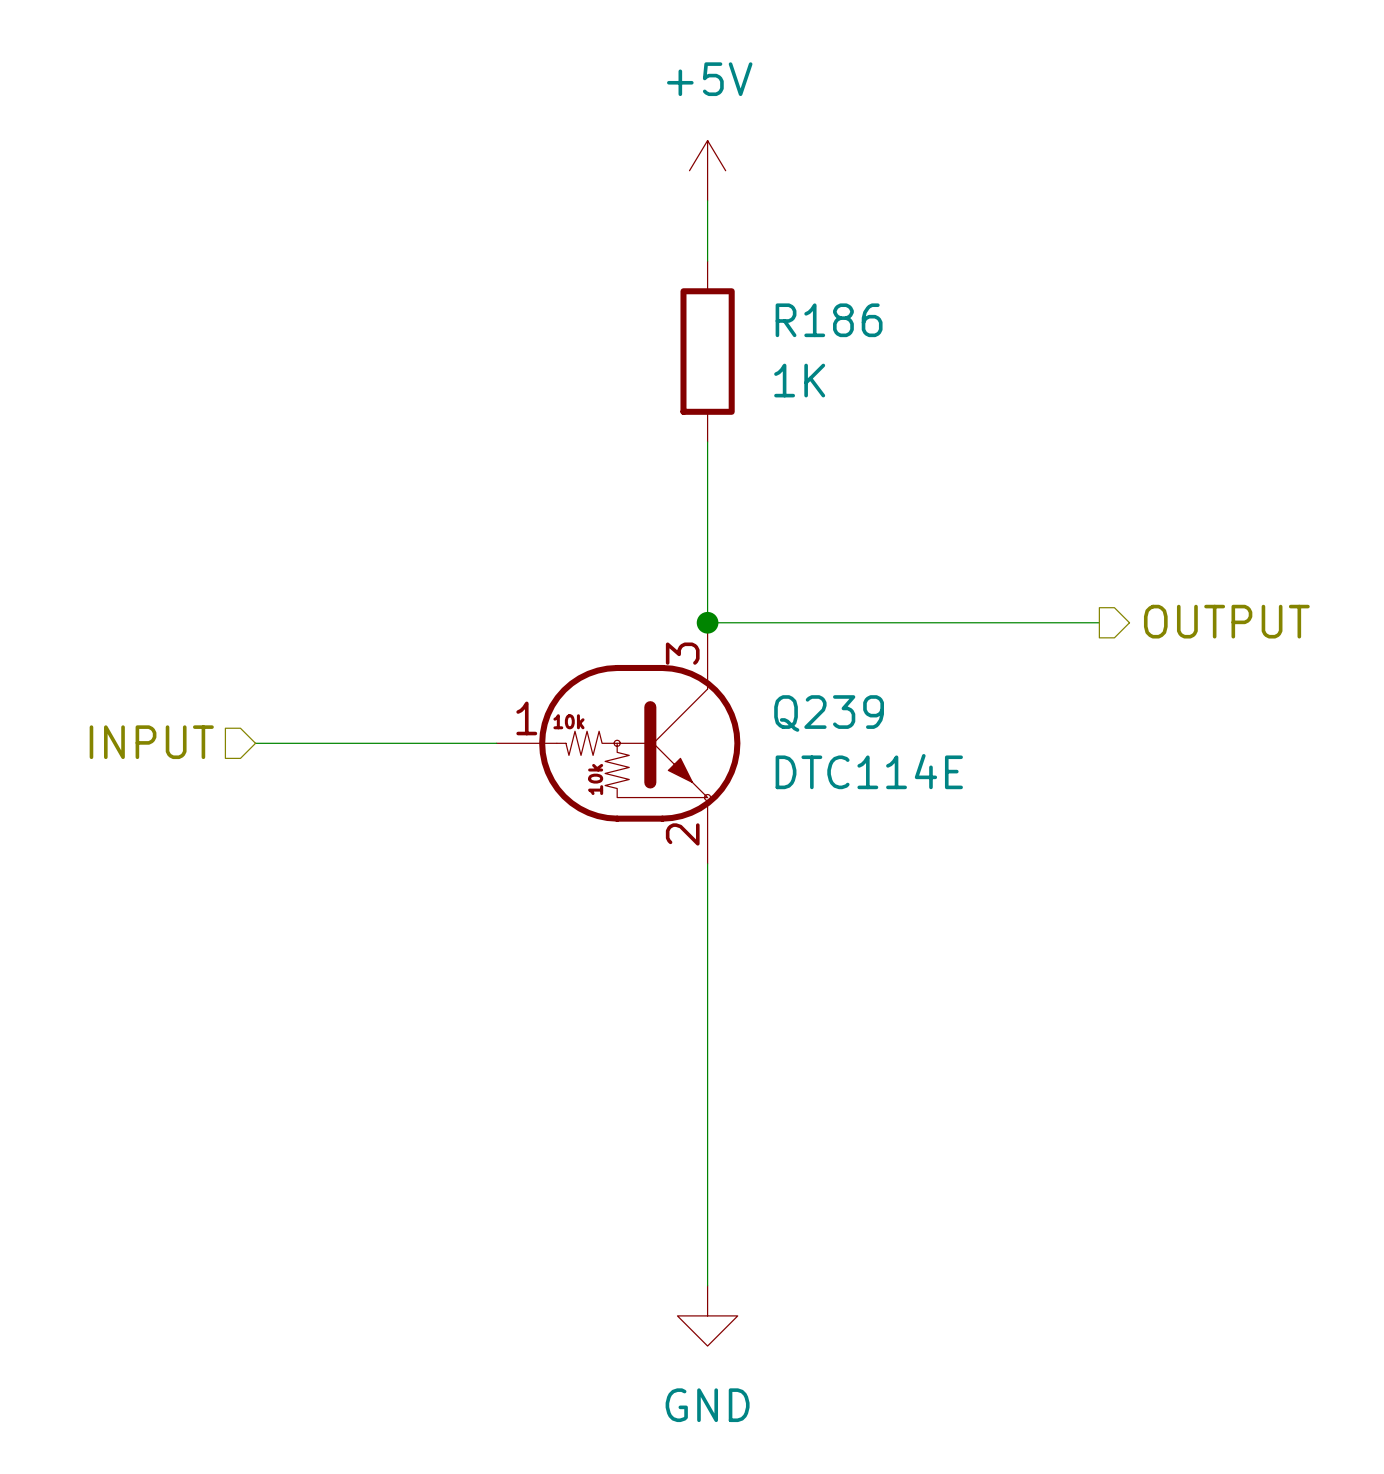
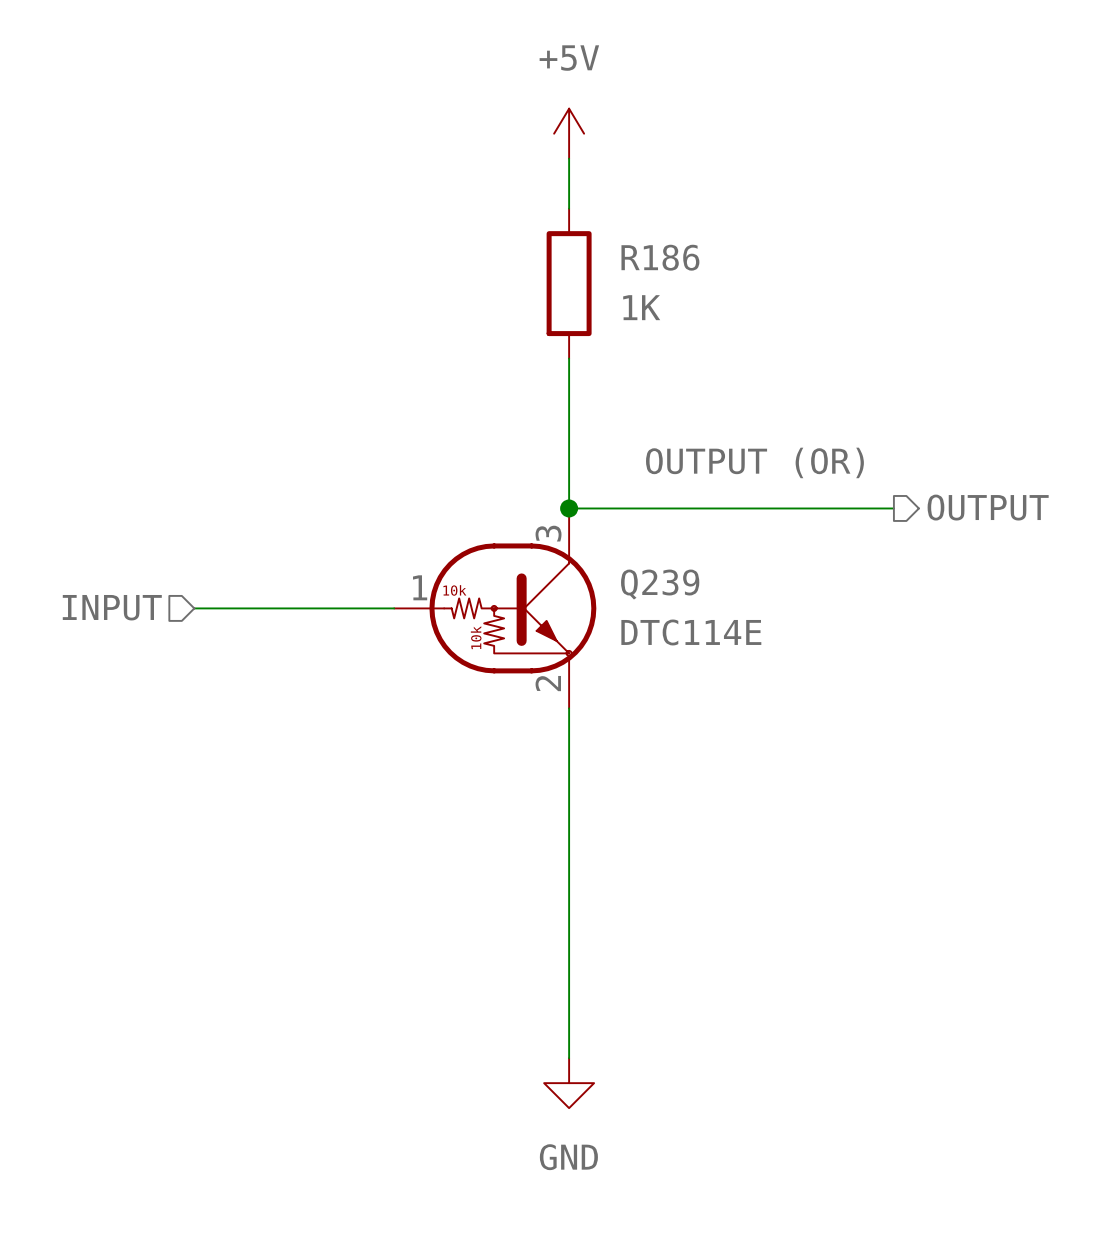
label: none -> OUTPUT (OR) (754, 462)

